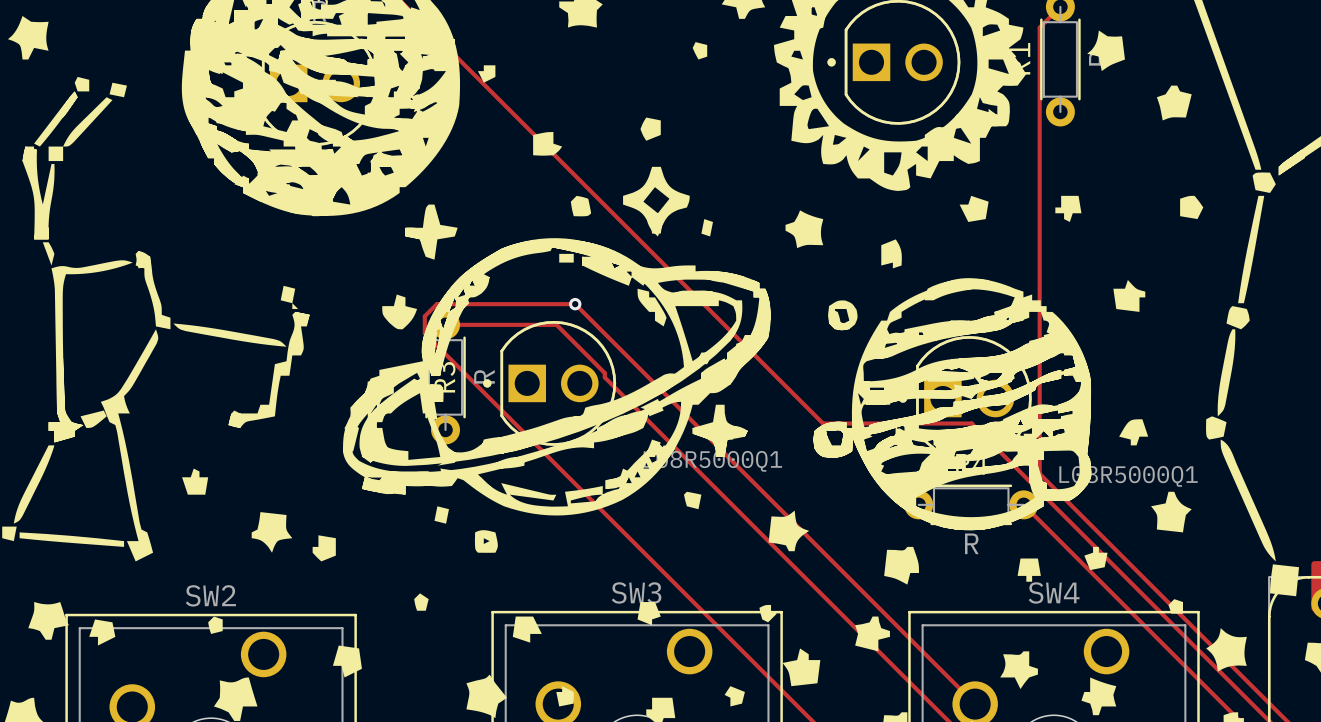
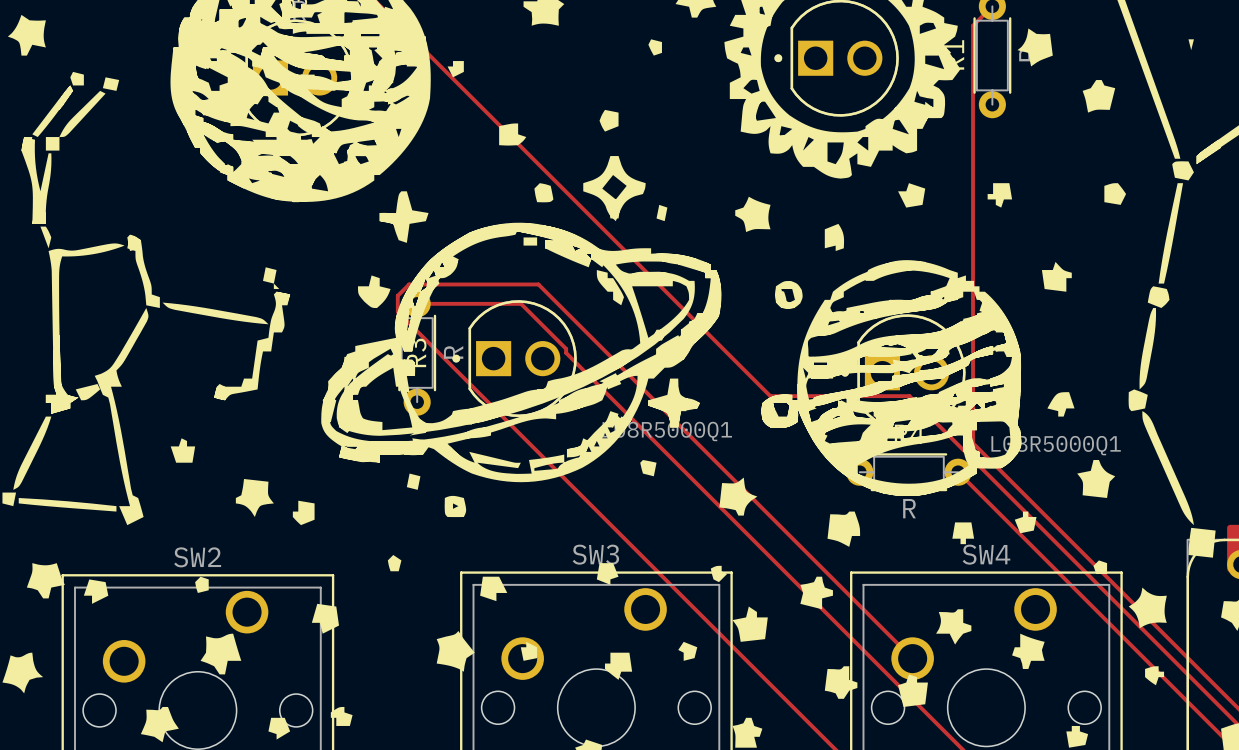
drawing: none -> [1188, 39, 1194, 51]
via: (575, 304) -> none

